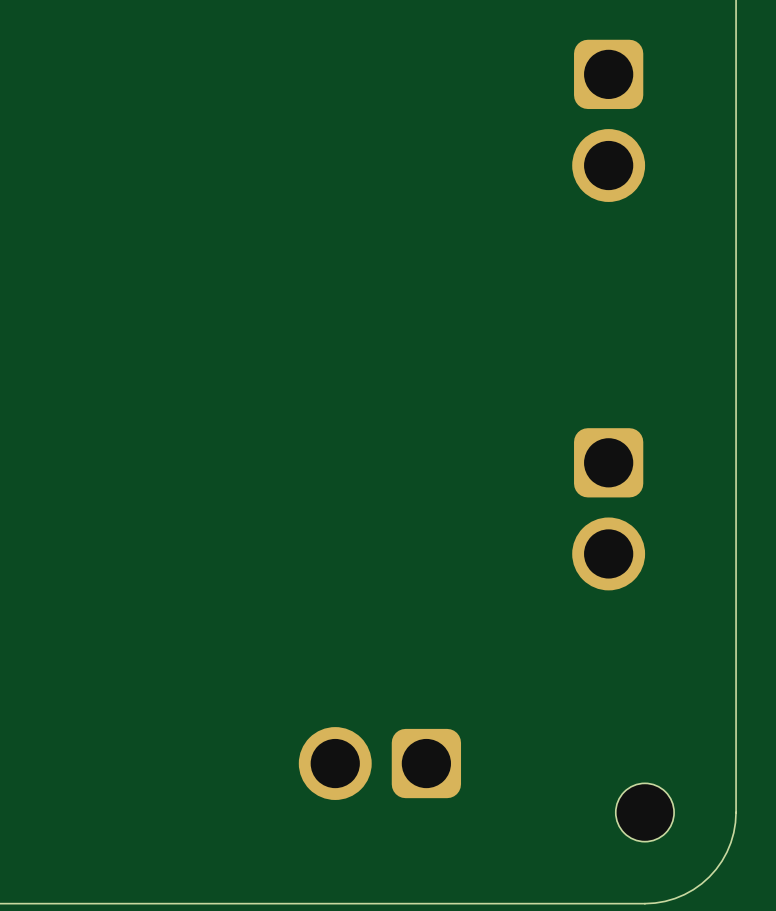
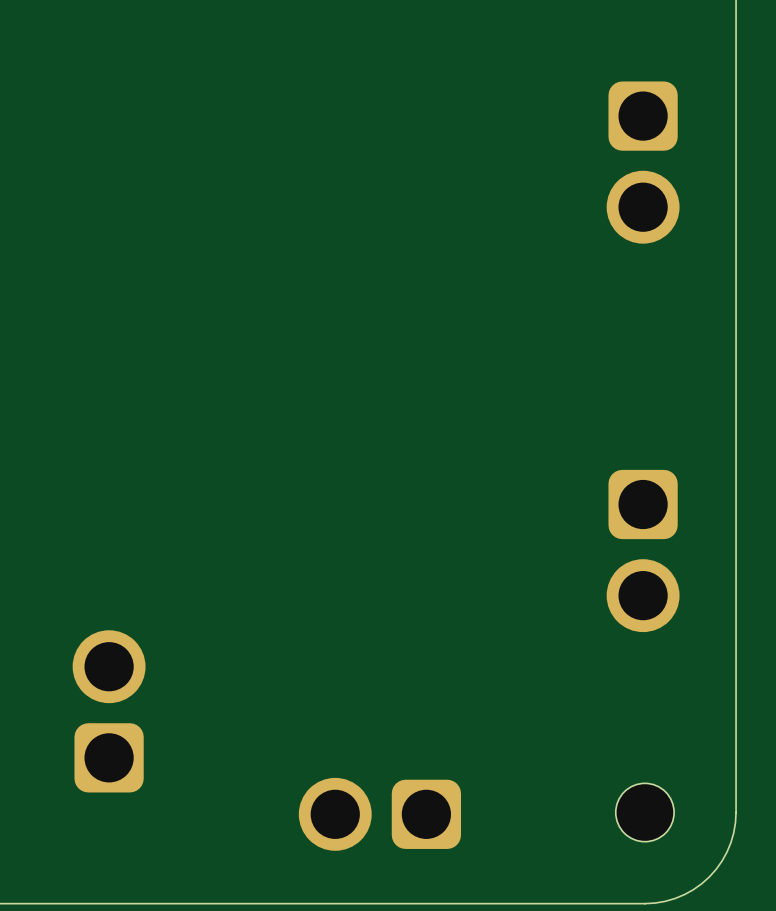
part position: (608, 120) -> (643, 162)
part position: (608, 509) -> (643, 550)
part: none -> (109, 711)
part position: (379, 763) -> (379, 814)

